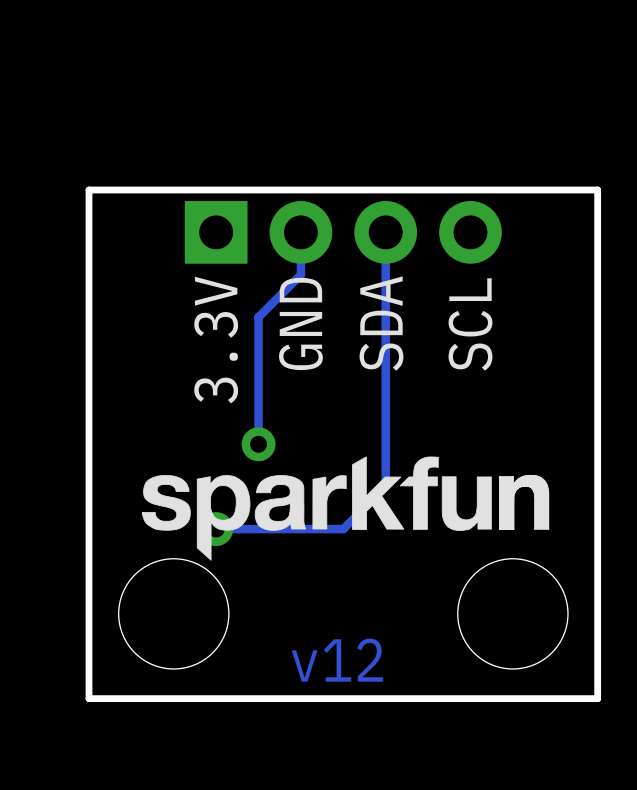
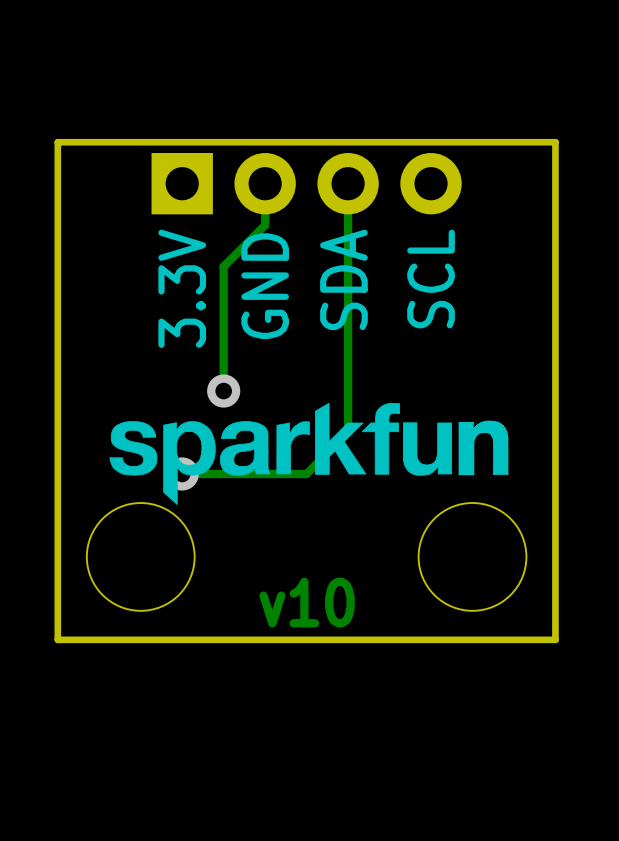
text: v12 (337, 660) -> v10 (307, 602)

